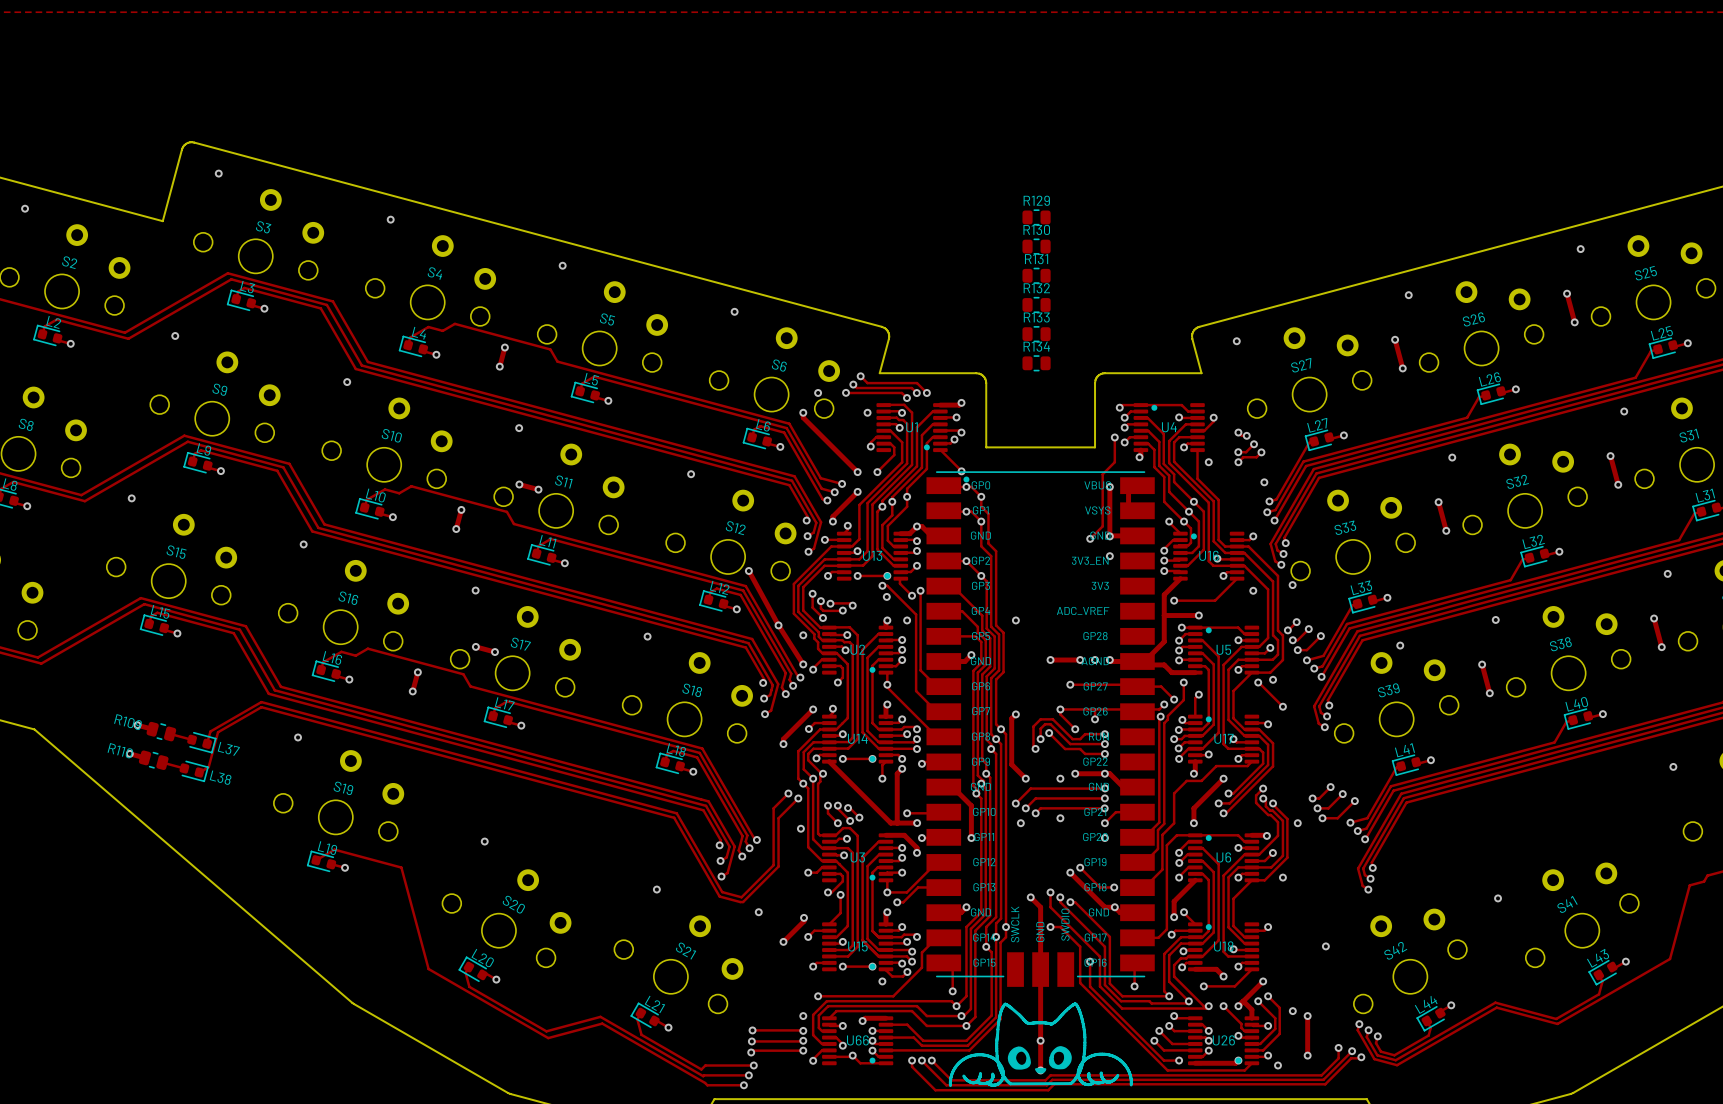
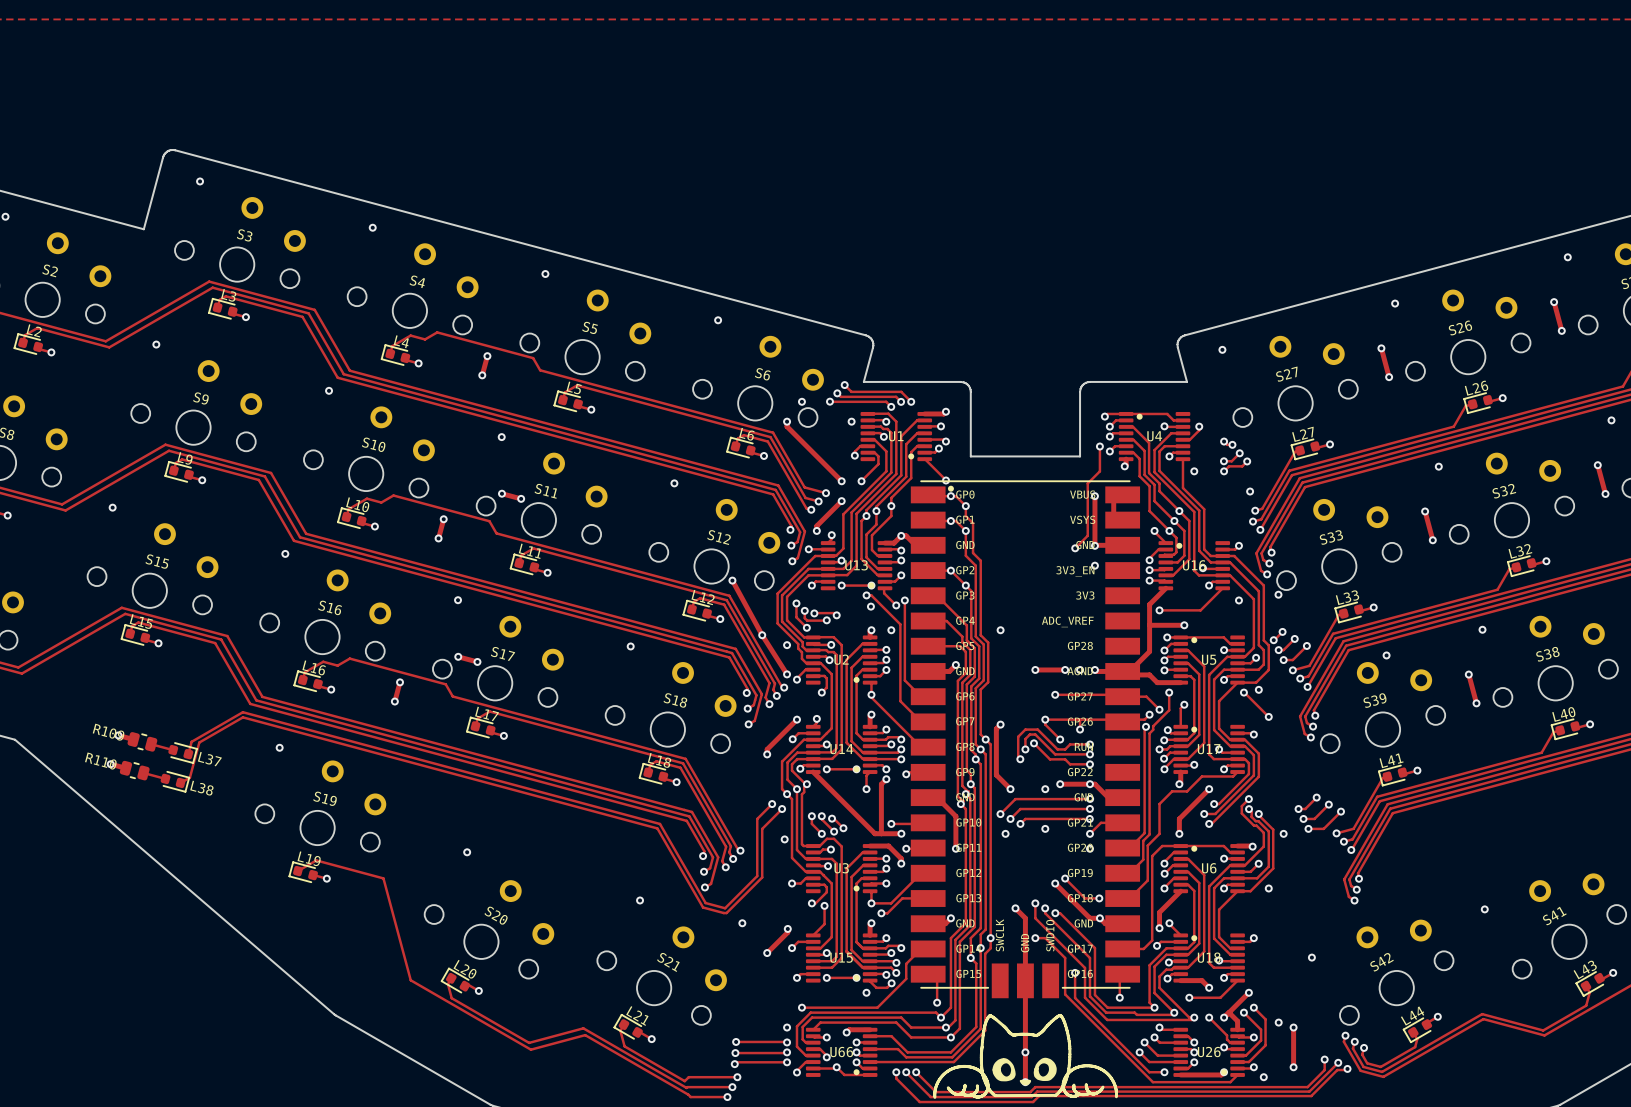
R129: (1036, 217) -> none
R130: (1036, 246) -> none
R131: (1036, 275) -> none
R132: (1036, 304) -> none
R133: (1036, 334) -> none
R134: (1036, 363) -> none

